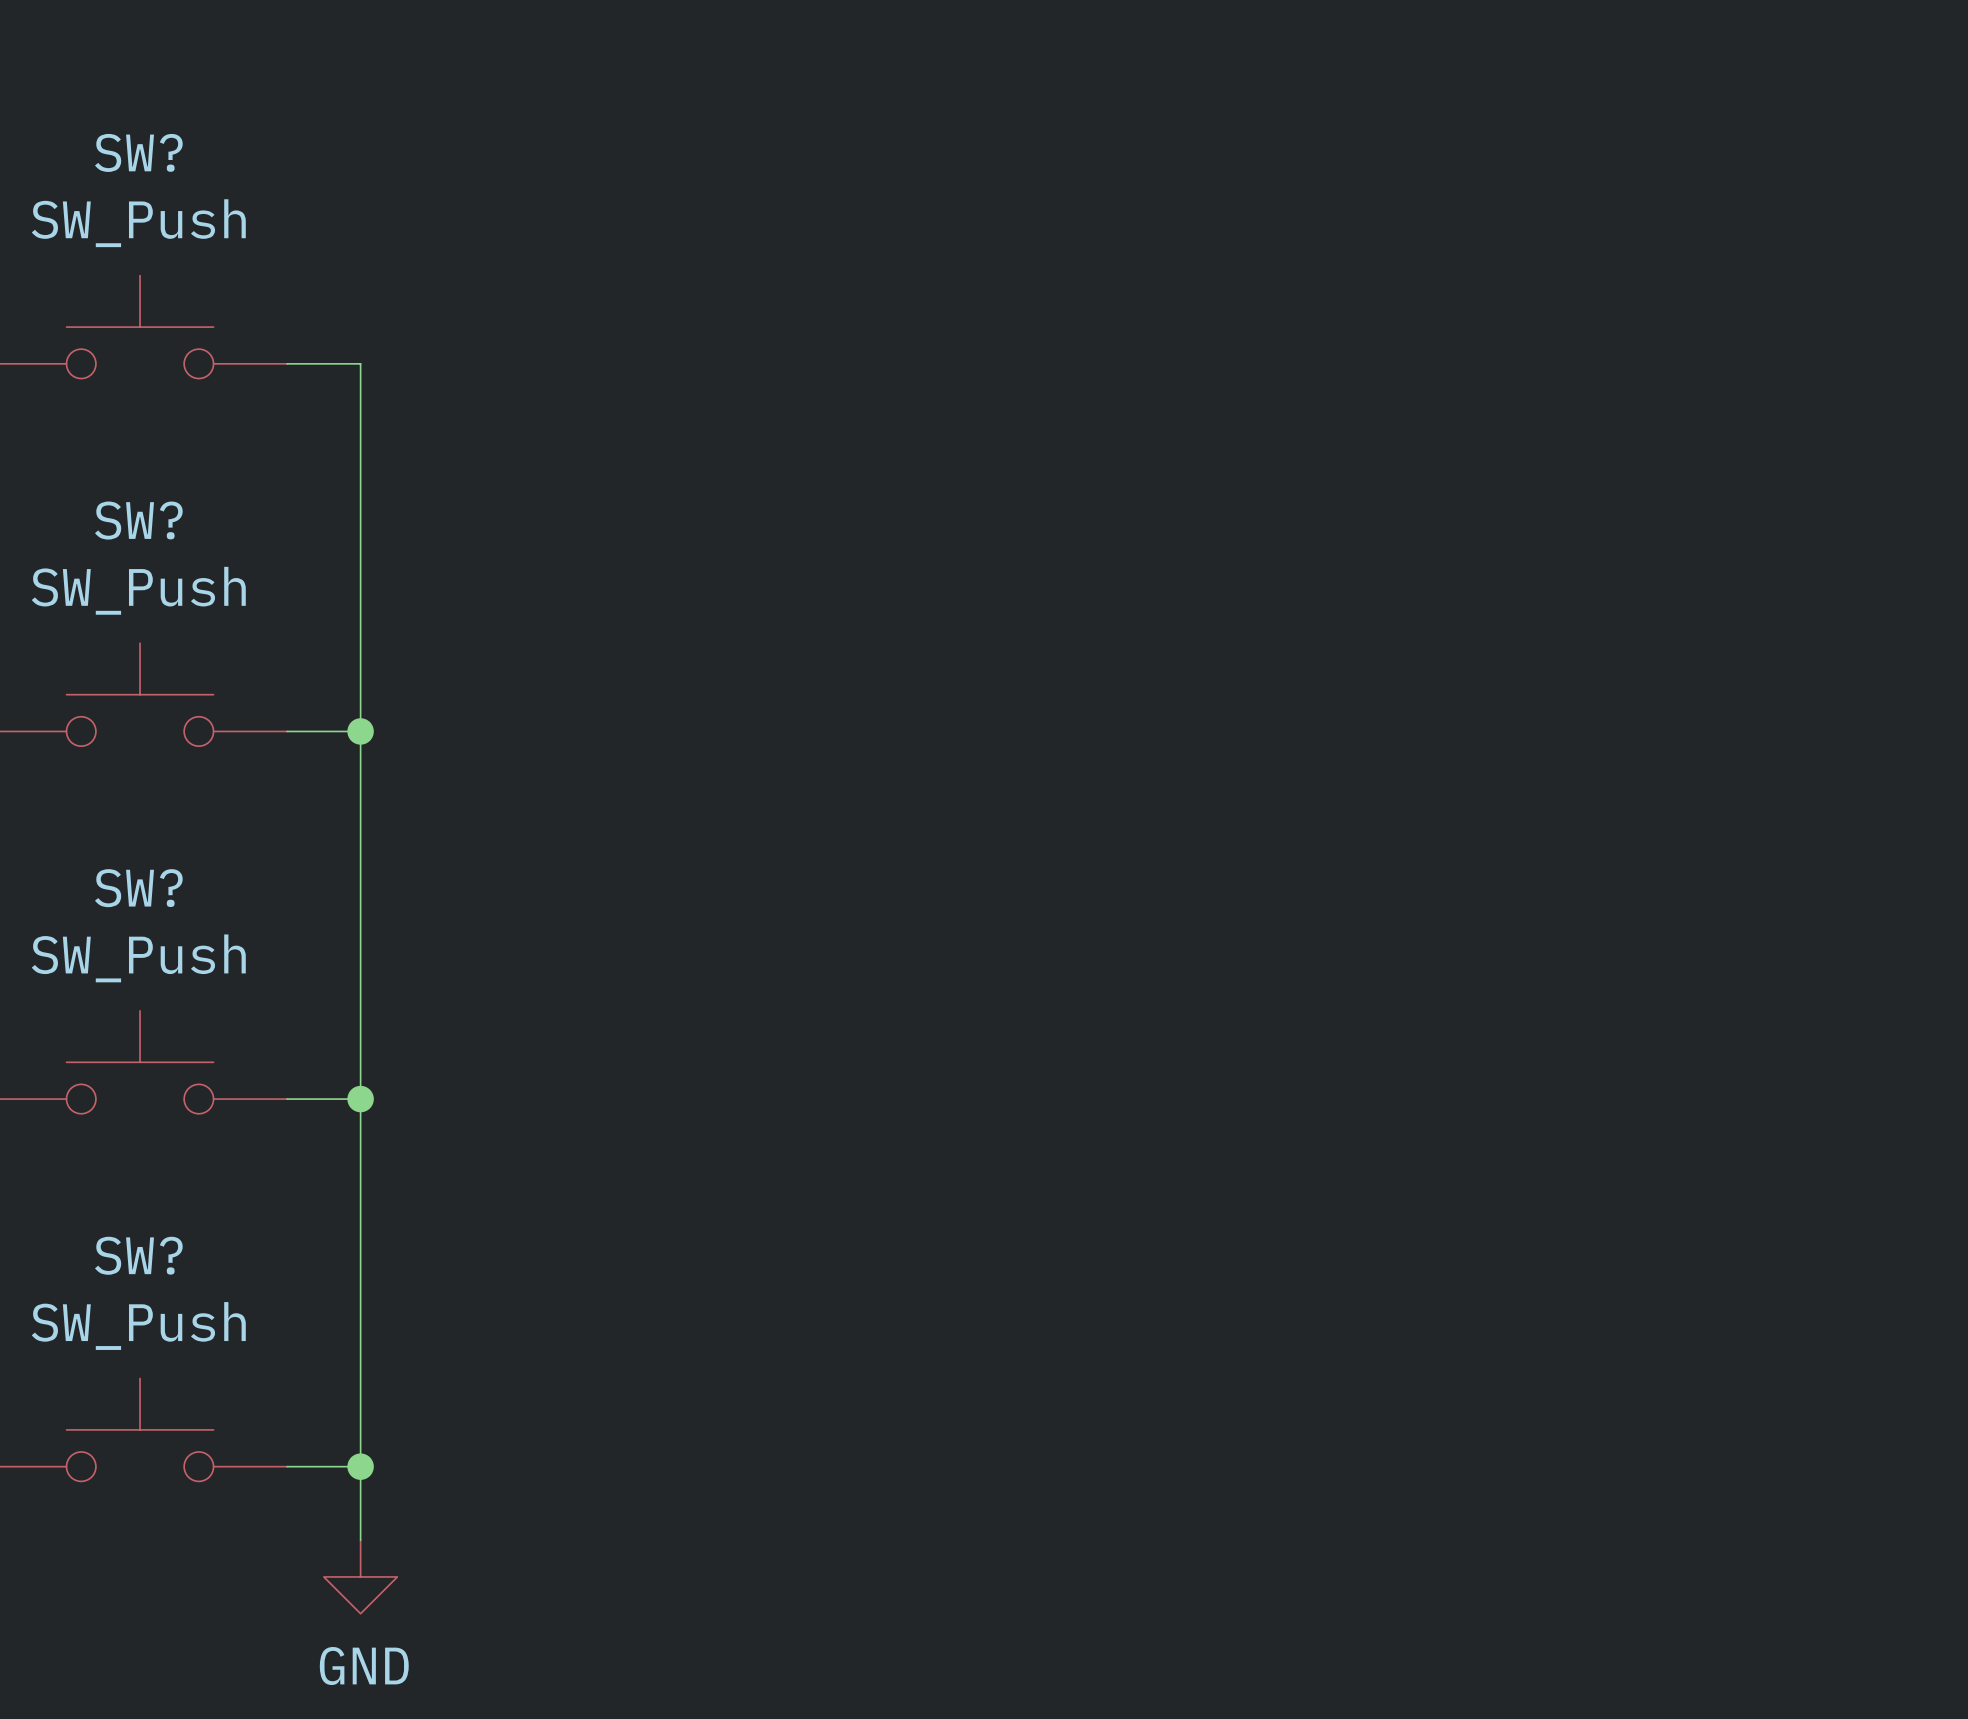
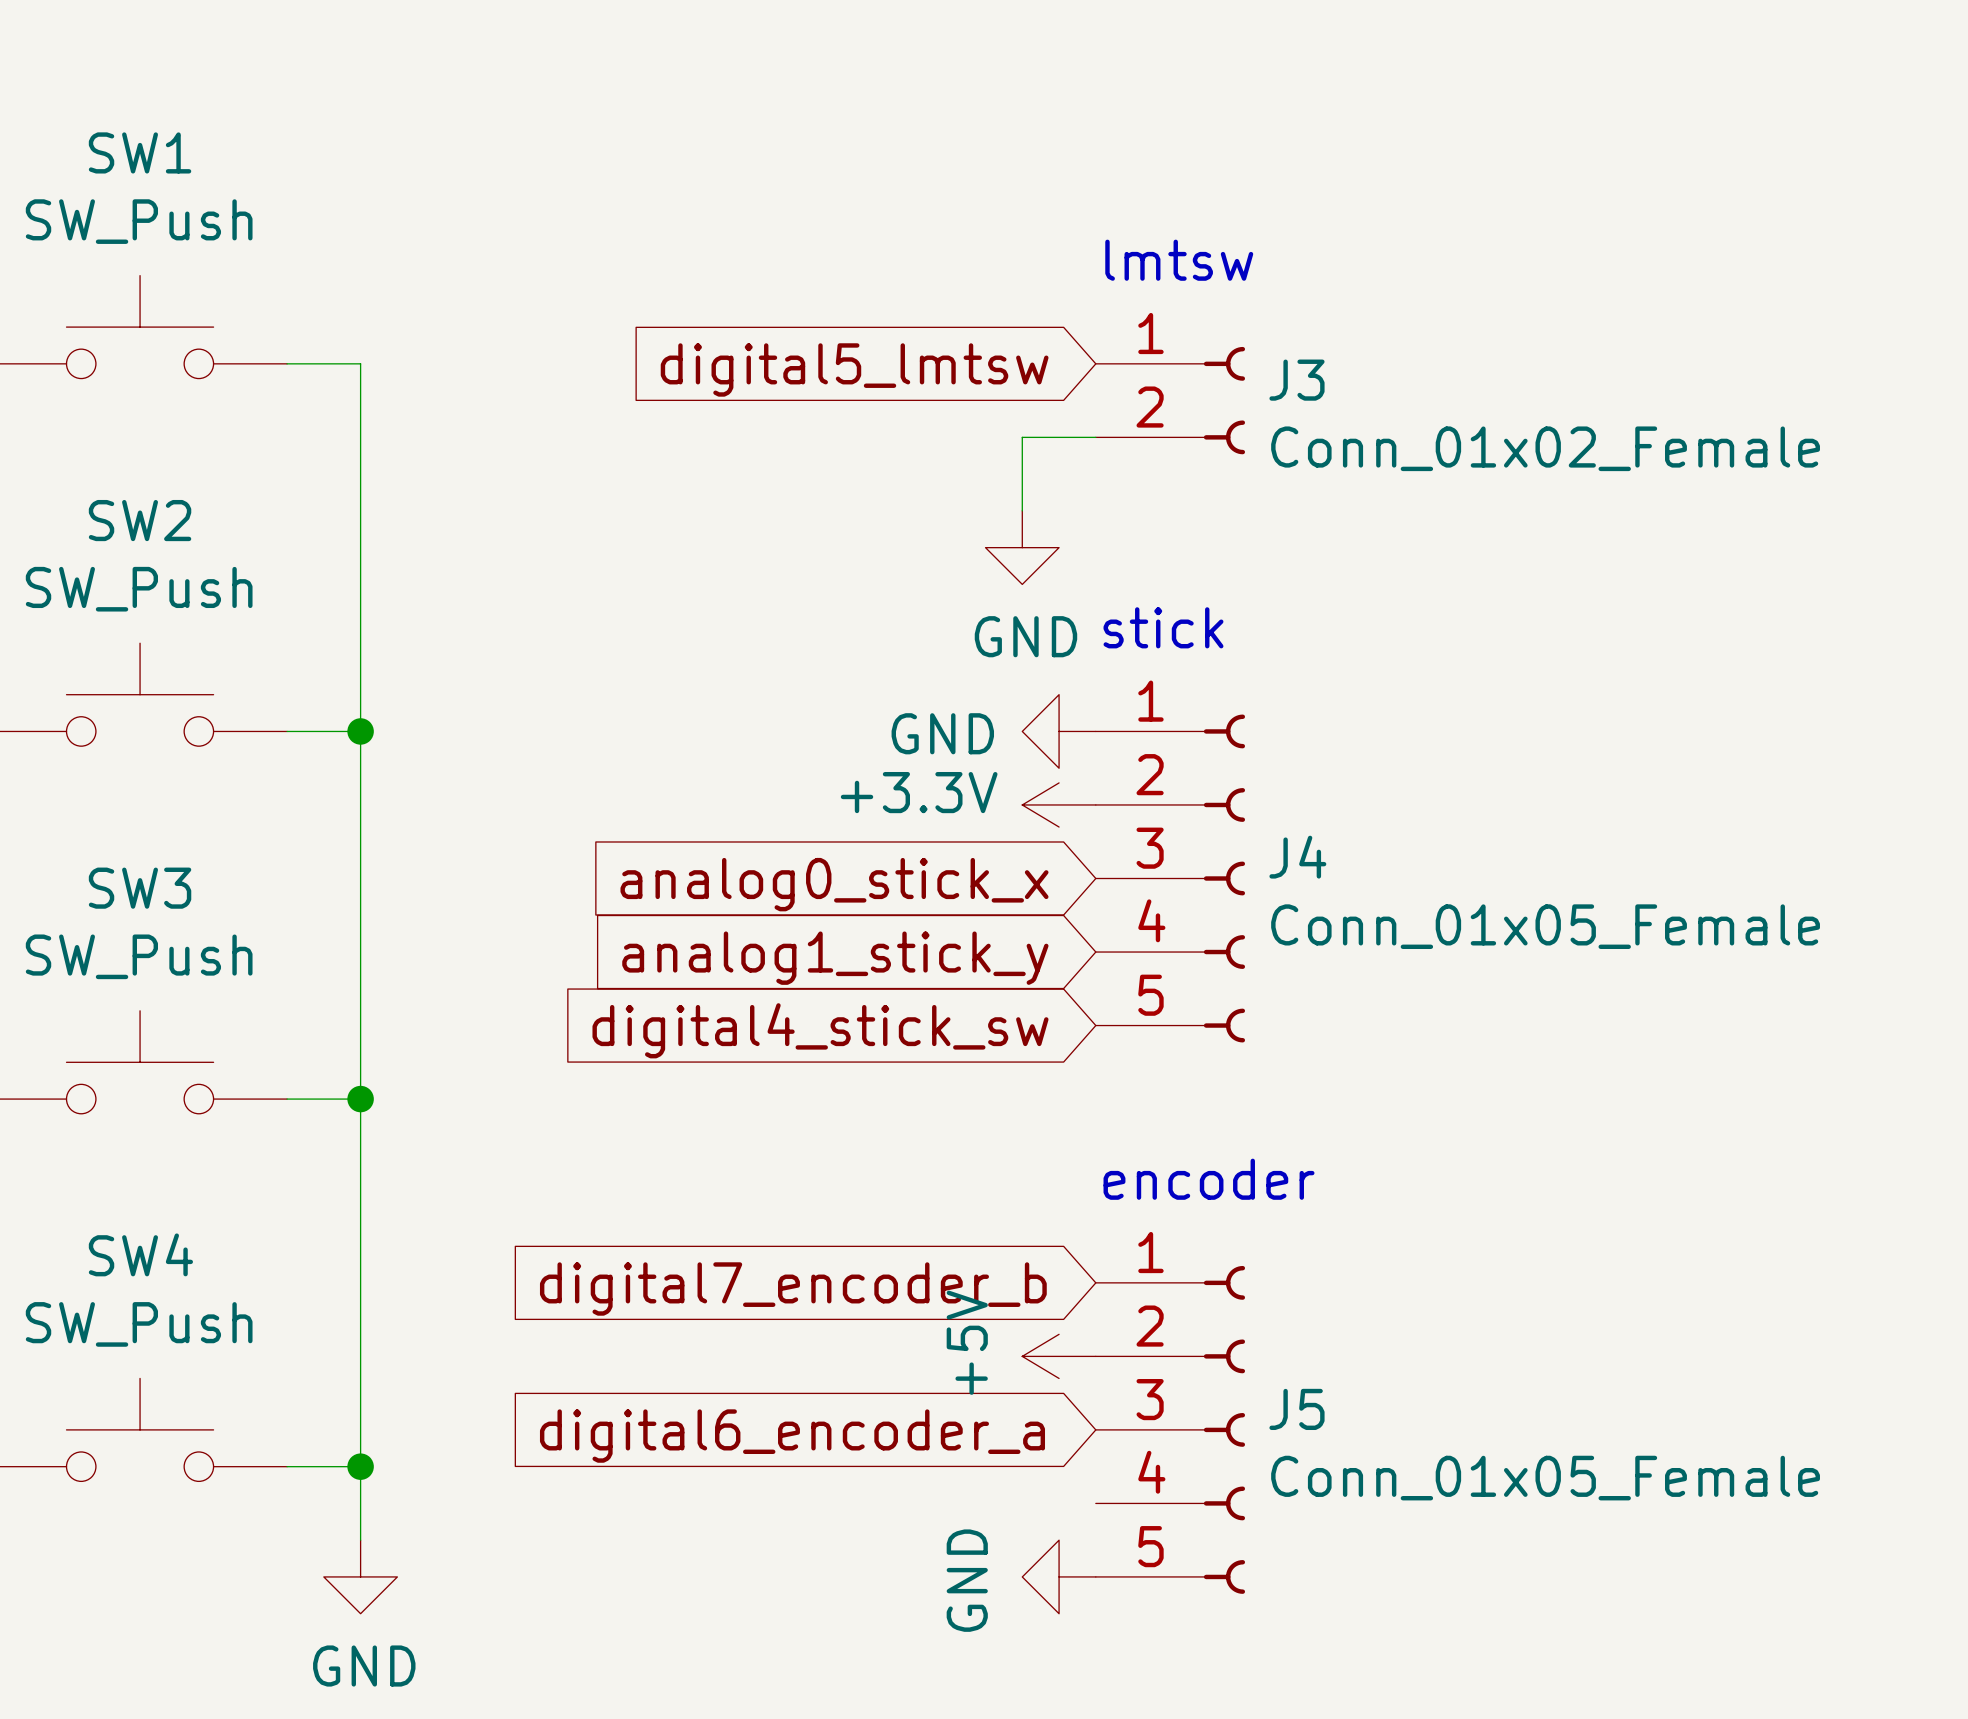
SW? name: SW? (138, 152) -> SW1 (140, 152)
text: none -> lmtsw (1179, 260)
global label: none -> digital5_lmtsw (854, 369)
J3: none -> Conn_01x02_Female (1170, 400)
wire: none -> (1095, 437) (1022, 437) (1022, 510)
SW? name: SW? (138, 520) -> SW2 (140, 520)
power symbol: none -> GND (1022, 547)
text: none -> stick (1163, 627)
power symbol: none -> GND (1059, 731)
power symbol: none -> +3.3V (1059, 804)
J4: none -> Conn_01x05_Female (1170, 878)
global label: none -> analog0_stick_x (834, 884)
SW? name: SW? (138, 888) -> SW3 (140, 888)
global label: none -> analog1_stick_y (835, 958)
global label: none -> digital4_stick_sw (820, 1030)
text: none -> encoder (1209, 1179)
SW? name: SW? (138, 1255) -> SW4 (140, 1254)
global label: none -> digital7_encoder_b (793, 1288)
power symbol: none -> +5V (1059, 1356)
J5: none -> Conn_01x05_Female (1170, 1429)
global label: none -> digital6_encoder_a (792, 1436)
power symbol: none -> GND (1059, 1576)

